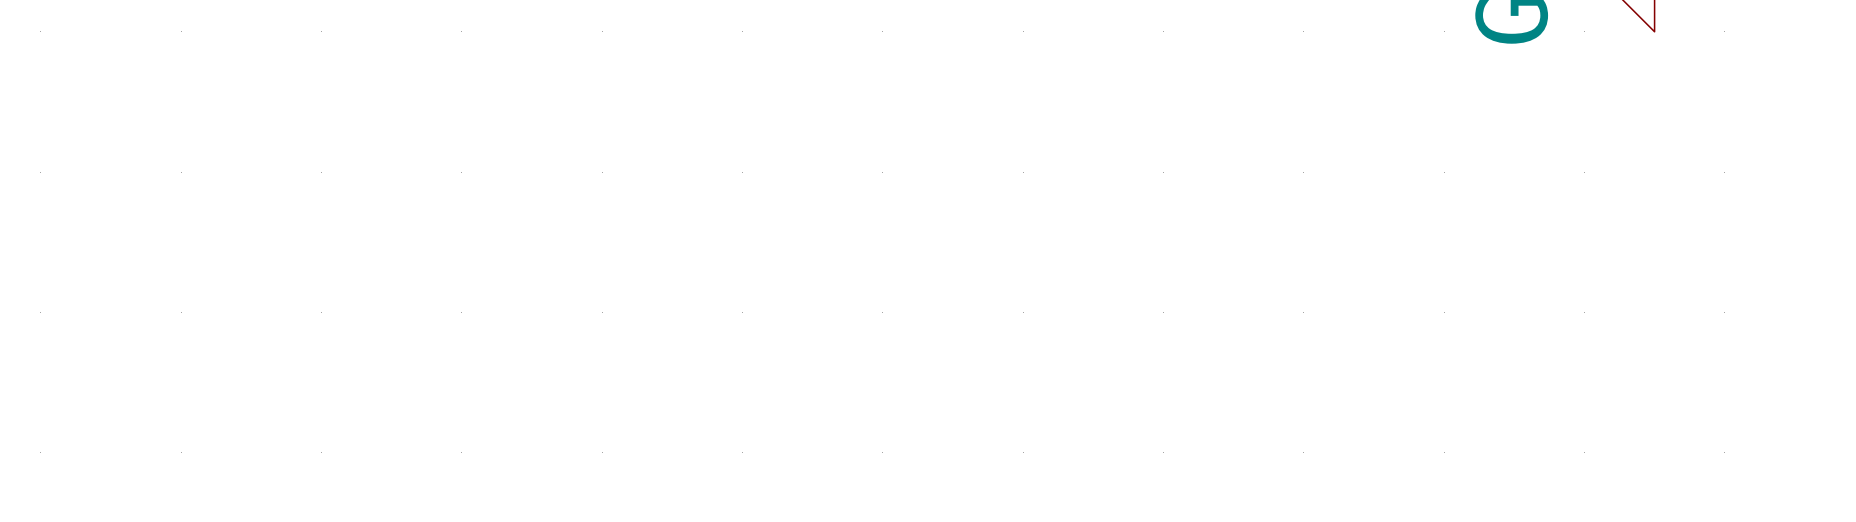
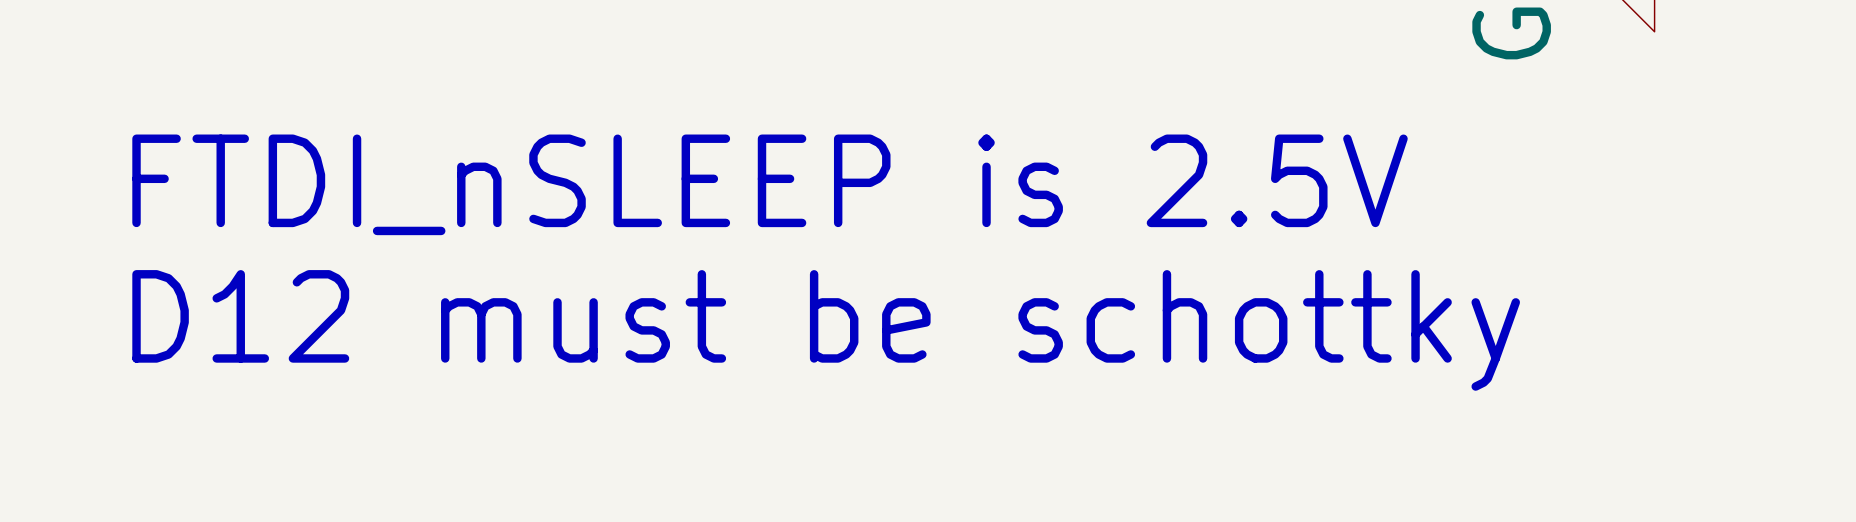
text: none -> FTDI_nSLEEP is 2.5V (770, 184)
text: none -> D12 must be schottky (826, 330)

